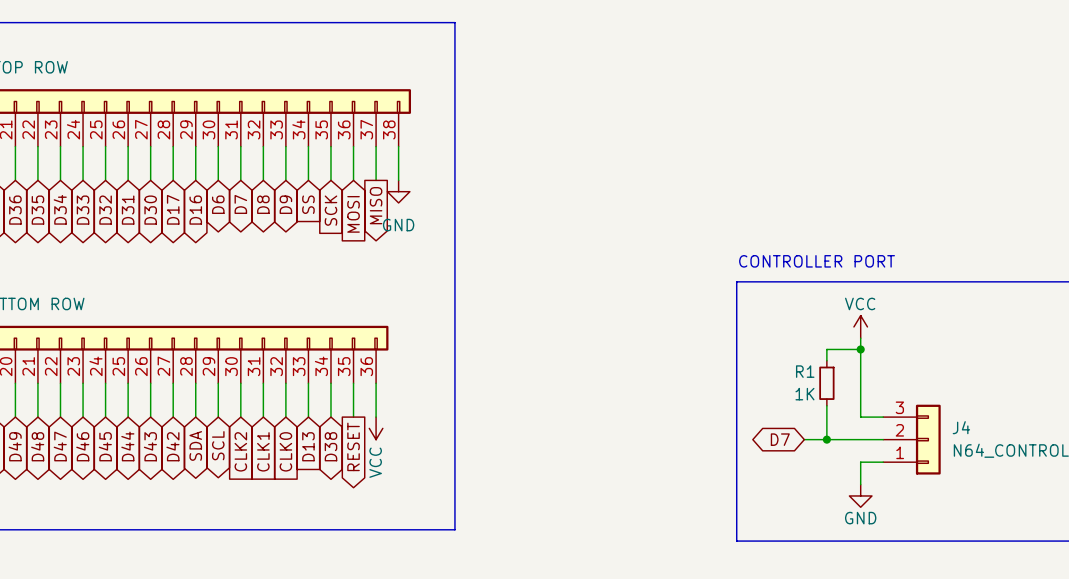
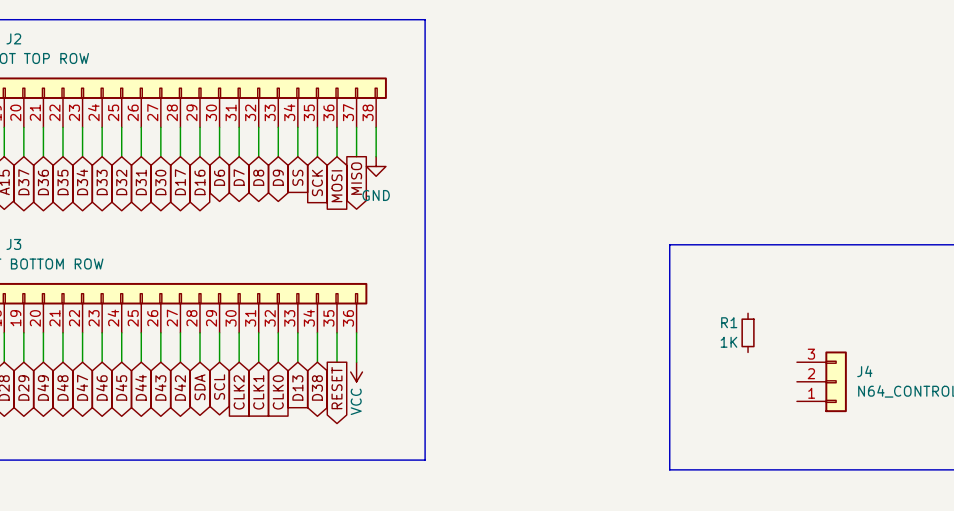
text: CONTROLLER PORT (817, 261) -> none
power symbol: VCC (860, 326) -> none
wire: (860, 338) (860, 417) (883, 417) -> none
wire: (860, 349) (826, 349) (826, 360) -> none
junction: (860, 349) -> none
wire: (826, 405) (826, 439) -> none
global label: D7 (780, 439) -> none
wire: (804, 439) (883, 439) -> none
junction: (826, 439) -> none
wire: (883, 462) (860, 462) (860, 484) -> none
power symbol: GND (860, 495) -> none

